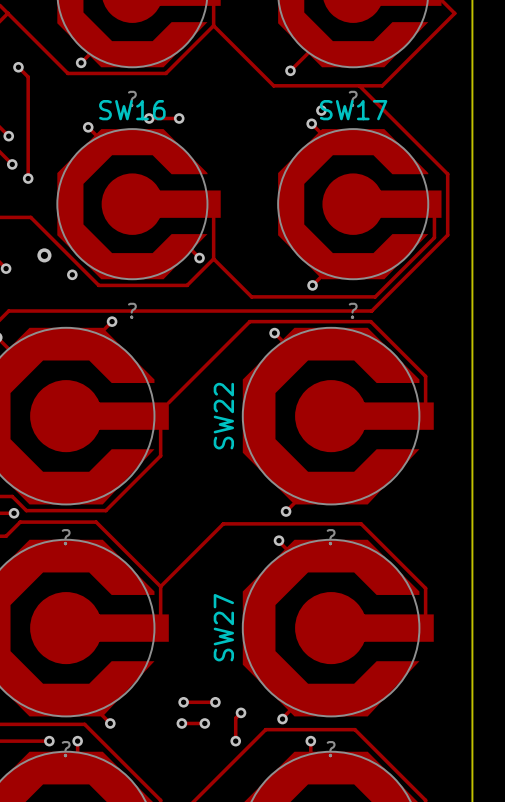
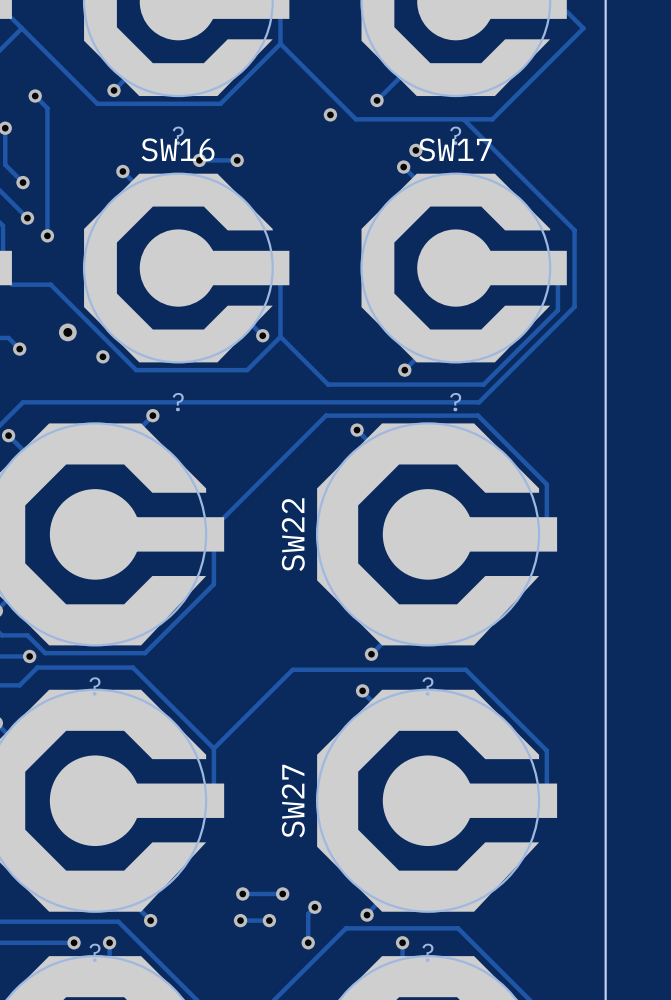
via: none -> (330, 114)

